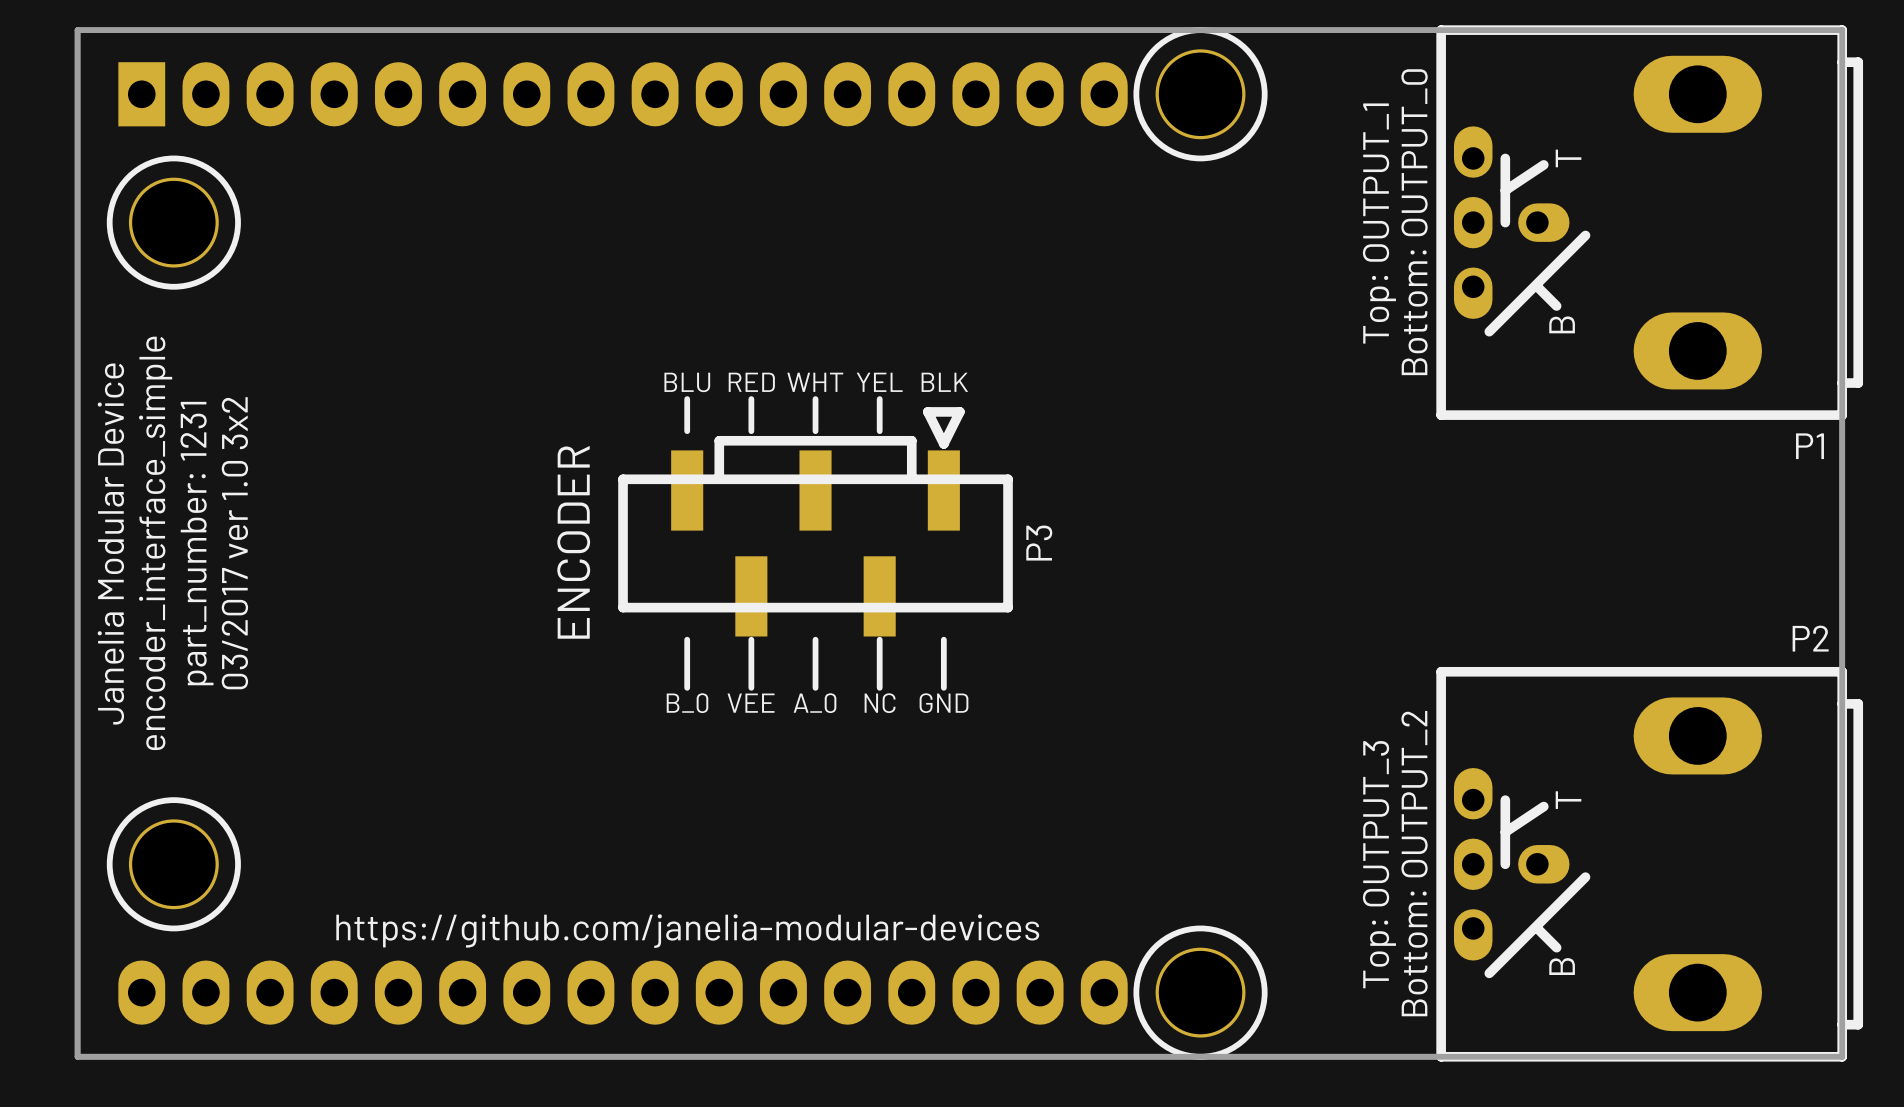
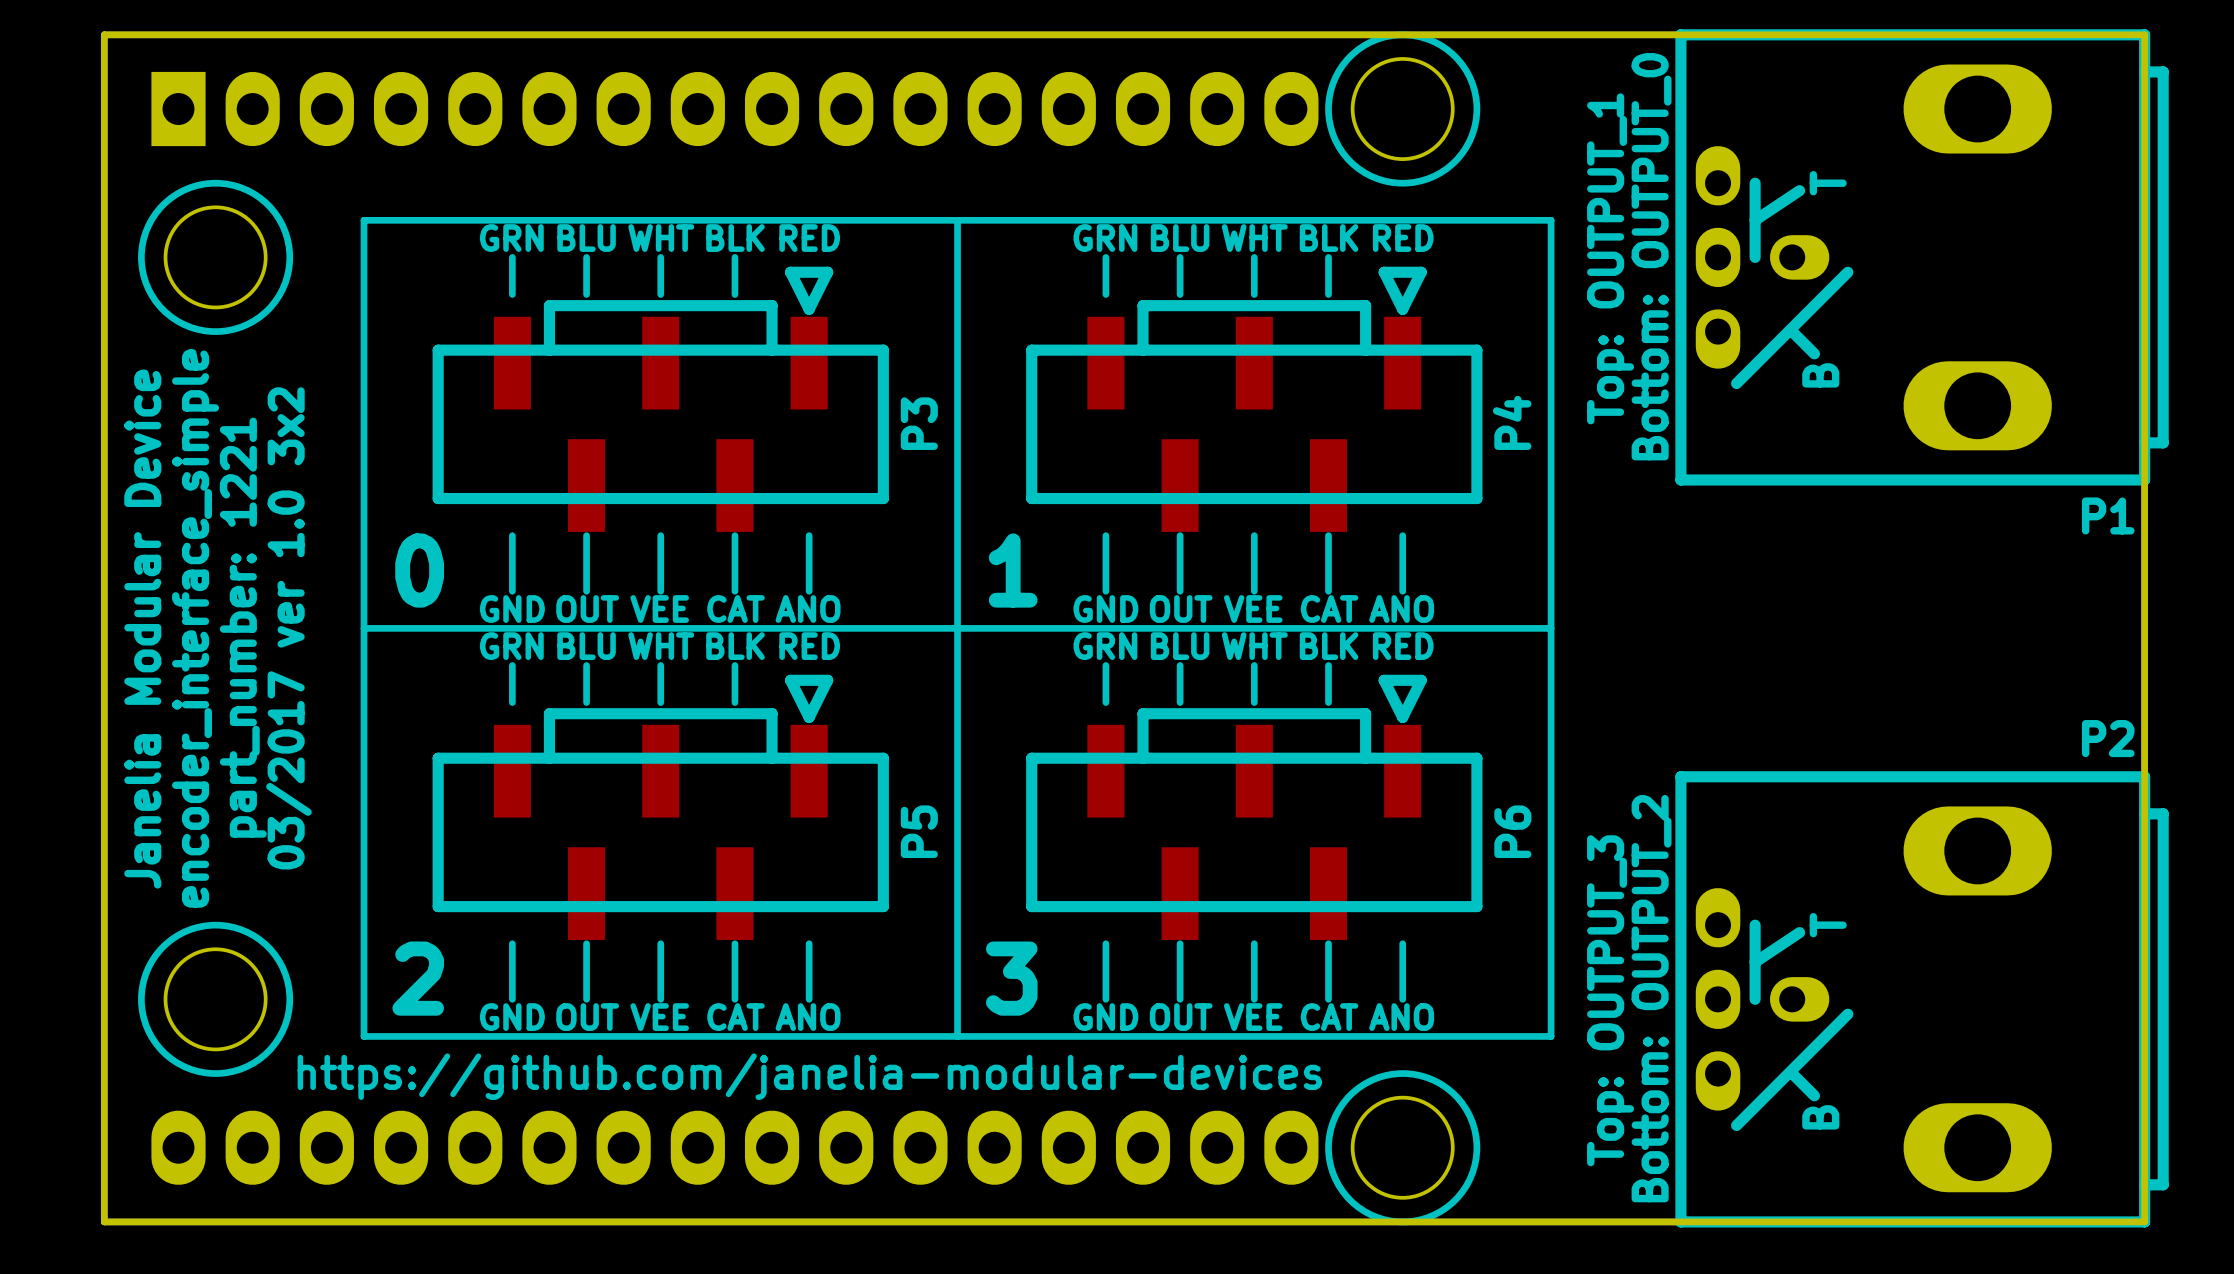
line: none -> (363, 220) (363, 1036) (1551, 1036) (1551, 220) (363, 220)
line: none -> (957, 220) (957, 461)
text: none -> GRN (511, 238)
text: none -> BLU (586, 238)
text: none -> WHT (661, 238)
text: none -> BLK (735, 238)
text: none -> RED (809, 238)
text: none -> GRN (1105, 238)
text: none -> BLU (1180, 238)
text: none -> WHT (1254, 238)
text: none -> BLK (1329, 238)
text: none -> RED (1403, 238)
line: none -> (512, 257) (512, 294)
line: none -> (660, 257) (660, 294)
line: none -> (1180, 257) (1180, 294)
line: none -> (1254, 257) (1254, 294)
line: none -> (1328, 257) (1328, 294)
P4: none -> (1254, 399)
text: BLU (687, 382) -> none
text: RED (751, 382) -> none
text: WHT (815, 382) -> none
text: YEL (879, 382) -> none
text: BLK (944, 382) -> none
line: (687, 399) (687, 431) -> (1105, 257) (1105, 294)
line: (751, 399) (751, 431) -> (586, 257) (586, 294)
line: (879, 399) (879, 431) -> (734, 257) (734, 294)
line: none -> (957, 498) (957, 739)
line: none -> (512, 535) (512, 591)
line: none -> (660, 535) (660, 591)
line: none -> (1180, 535) (1180, 591)
line: none -> (1254, 535) (1254, 591)
line: none -> (1328, 535) (1328, 591)
line: none -> (1402, 535) (1402, 591)
text: none -> 0 (419, 570)
text: none -> 1 (1013, 570)
P3 position: (815, 521) -> (660, 399)
text: none -> GND (512, 609)
text: none -> OUT (587, 609)
text: none -> VEE (659, 609)
text: none -> CAT (736, 609)
text: none -> ANO (808, 609)
text: none -> GND (1105, 609)
text: none -> OUT (1181, 609)
text: none -> VEE (1253, 609)
text: none -> CAT (1329, 609)
text: none -> ANO (1401, 609)
text: ENCODER (573, 542) -> none
text: part_number: 1231 (196, 543) -> part_number: 1221 (243, 627)
line: none -> (363, 628) (1551, 628)
text: none -> GRN (511, 646)
text: none -> BLU (586, 646)
text: none -> WHT (661, 646)
text: none -> BLK (735, 646)
text: none -> RED (809, 646)
text: none -> GRN (1105, 646)
text: none -> BLU (1180, 646)
text: none -> WHT (1254, 646)
text: none -> BLK (1329, 646)
text: none -> RED (1403, 646)
line: none -> (512, 665) (512, 702)
line: none -> (586, 665) (586, 702)
line: none -> (660, 665) (660, 702)
line: none -> (734, 665) (734, 702)
line: none -> (1105, 665) (1105, 702)
line: none -> (1180, 665) (1180, 702)
line: none -> (1254, 665) (1254, 702)
line: none -> (1328, 665) (1328, 702)
line: (687, 639) (687, 687) -> (1105, 535) (1105, 591)
line: (751, 639) (751, 687) -> (586, 535) (586, 591)
line: (879, 639) (879, 687) -> (734, 535) (734, 591)
line: (943, 639) (943, 687) -> (809, 535) (809, 591)
line: none -> (957, 795) (957, 1036)
P5: none -> (660, 807)
P6: none -> (1254, 807)
text: B_0 (687, 703) -> none
text: VEE (751, 703) -> none
text: A_0 (815, 703) -> none
text: NC (880, 703) -> none
text: GND (943, 703) -> none
line: none -> (512, 943) (512, 999)
line: none -> (586, 943) (586, 999)
line: none -> (660, 943) (660, 999)
line: none -> (734, 943) (734, 999)
line: none -> (809, 943) (809, 999)
line: none -> (1105, 943) (1105, 999)
line: none -> (1180, 943) (1180, 999)
line: none -> (1254, 943) (1254, 999)
line: none -> (1328, 943) (1328, 999)
line: none -> (1402, 943) (1402, 999)
text: none -> 2 (418, 978)
text: none -> 3 (1011, 978)
text: none -> GND (512, 1017)
text: none -> OUT (587, 1017)
text: none -> VEE (659, 1017)
text: none -> CAT (736, 1017)
text: none -> ANO (808, 1017)
text: none -> GND (1105, 1017)
text: none -> OUT (1181, 1017)
text: none -> VEE (1253, 1017)
text: none -> CAT (1329, 1017)
text: none -> ANO (1401, 1017)

